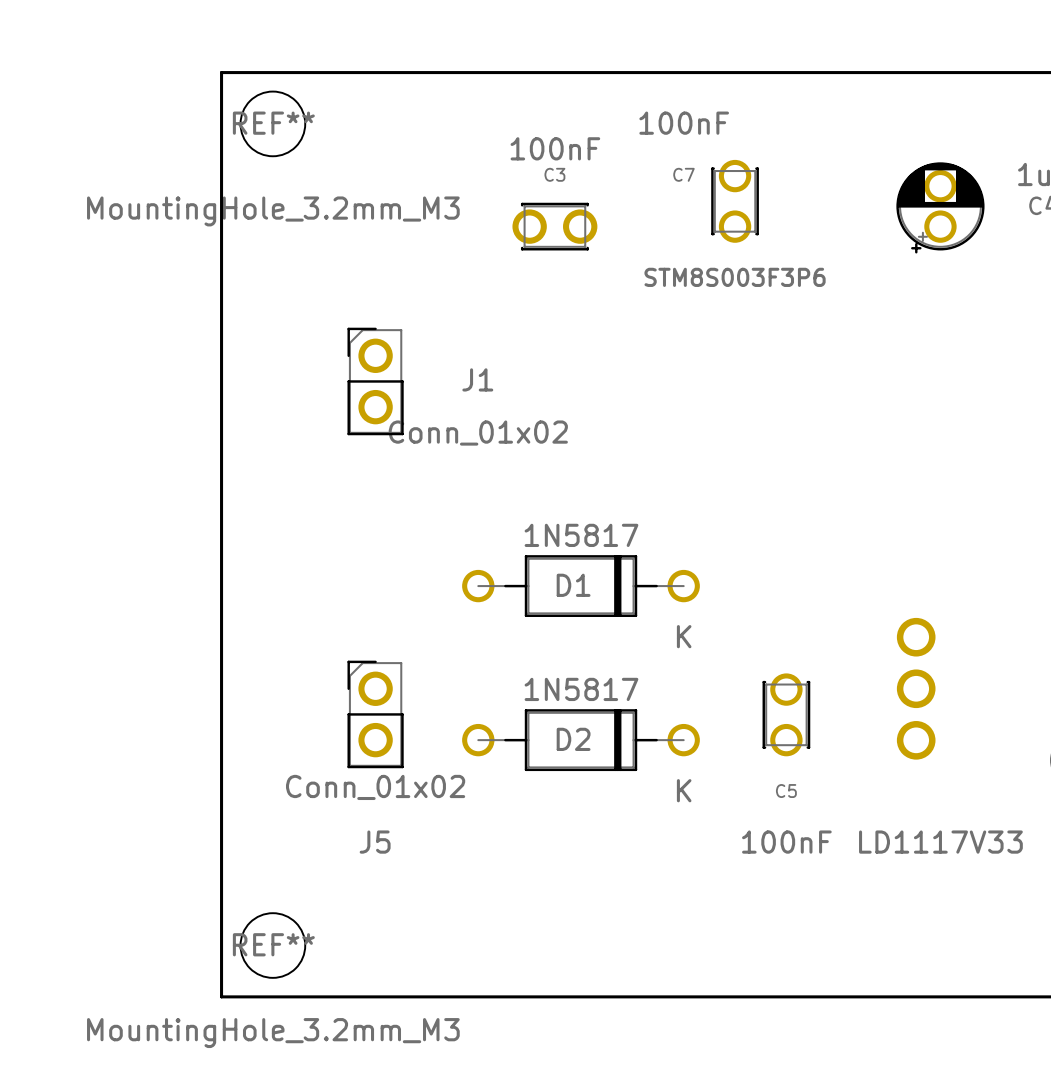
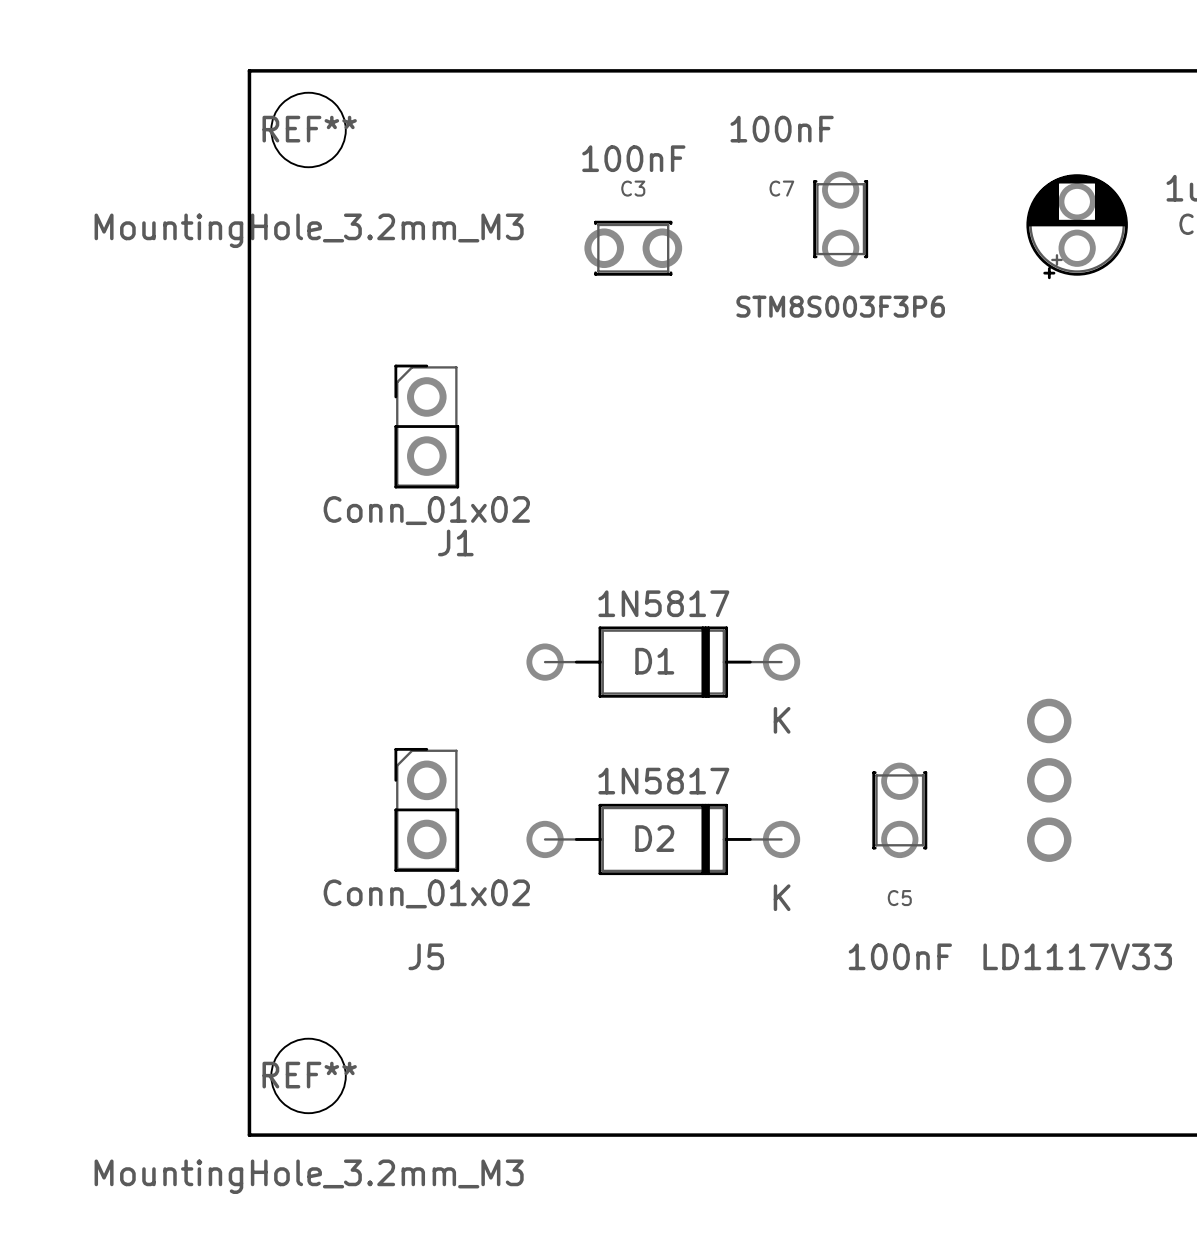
J1 name position: J1 (477, 379) -> J1 (455, 542)
J1 value position: Conn_01x02 (478, 433) -> Conn_01x02 (426, 510)

